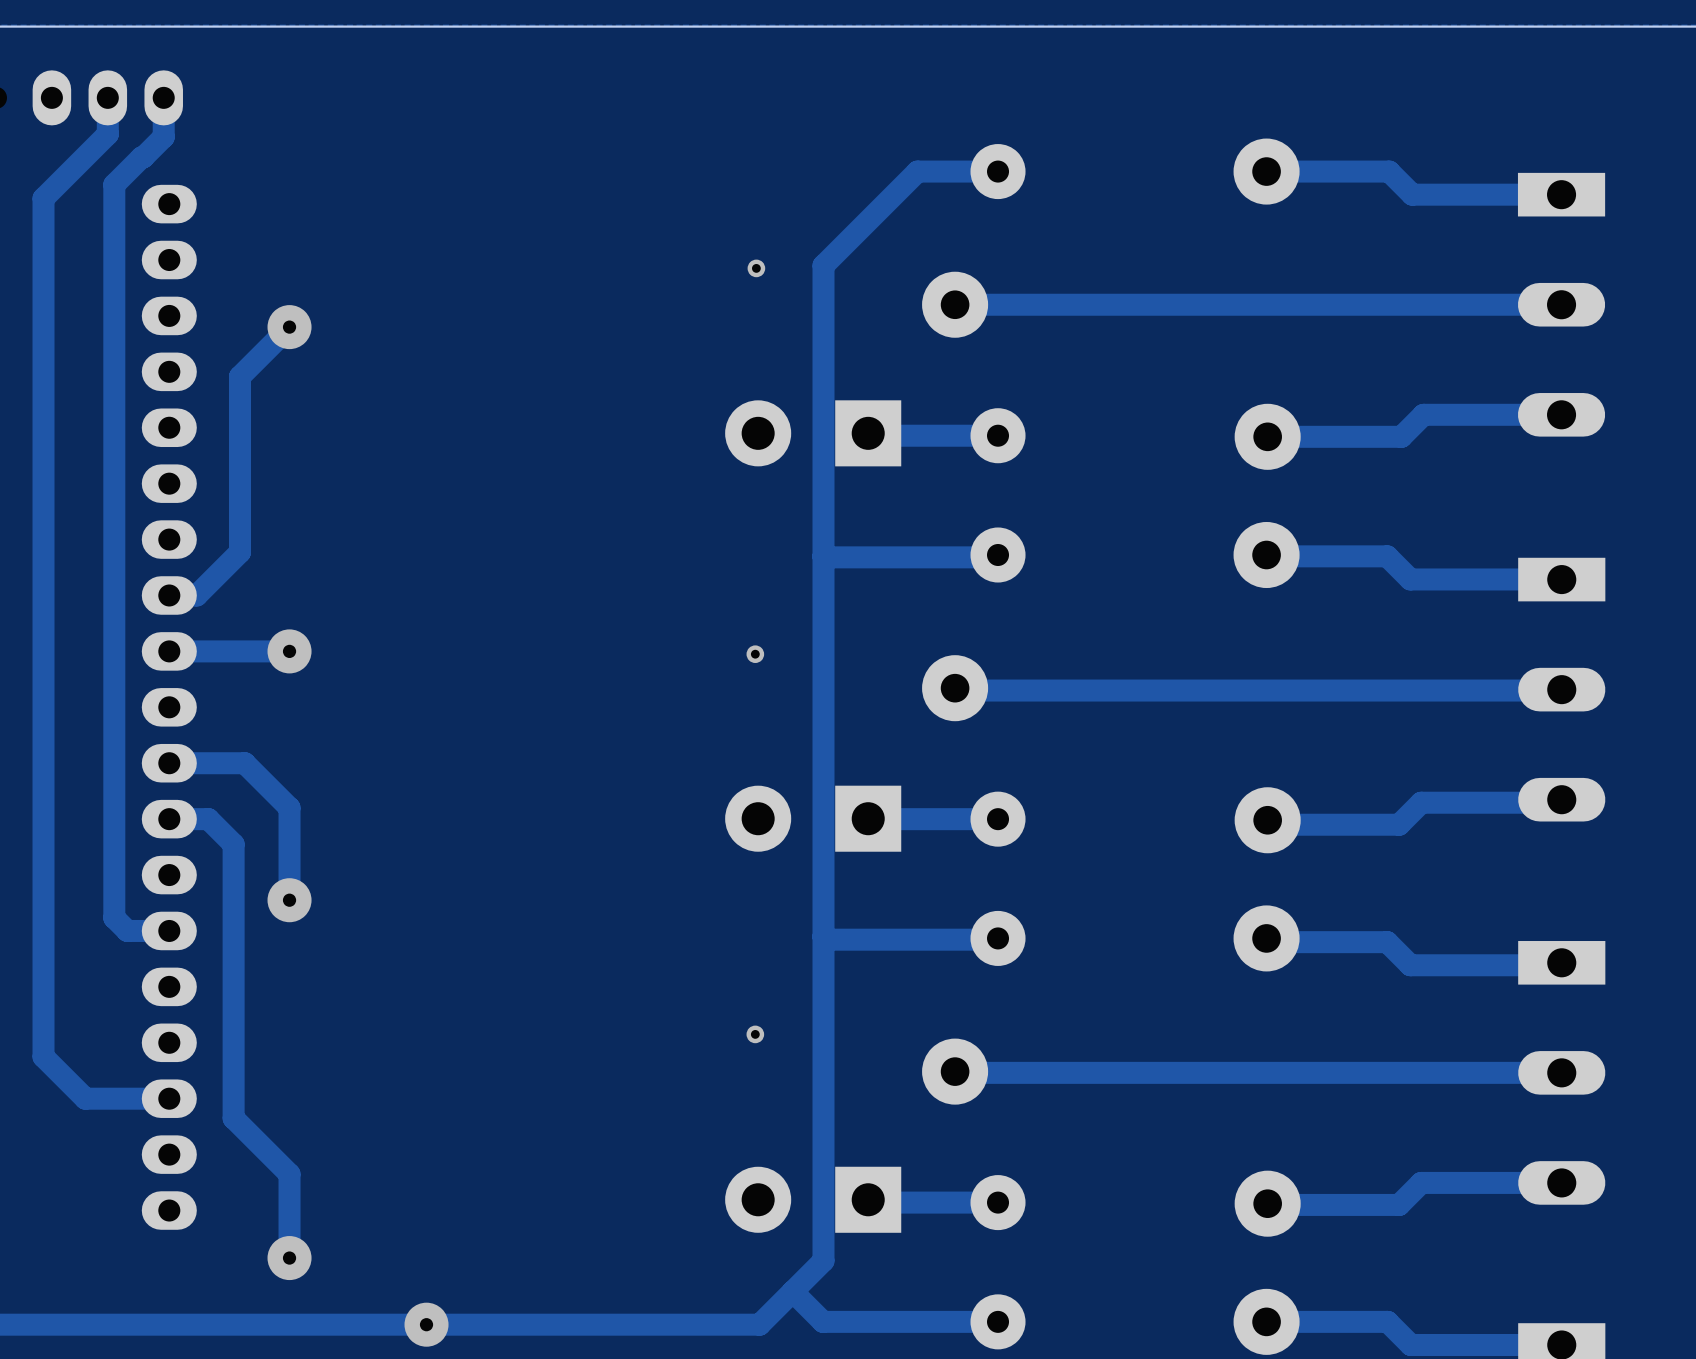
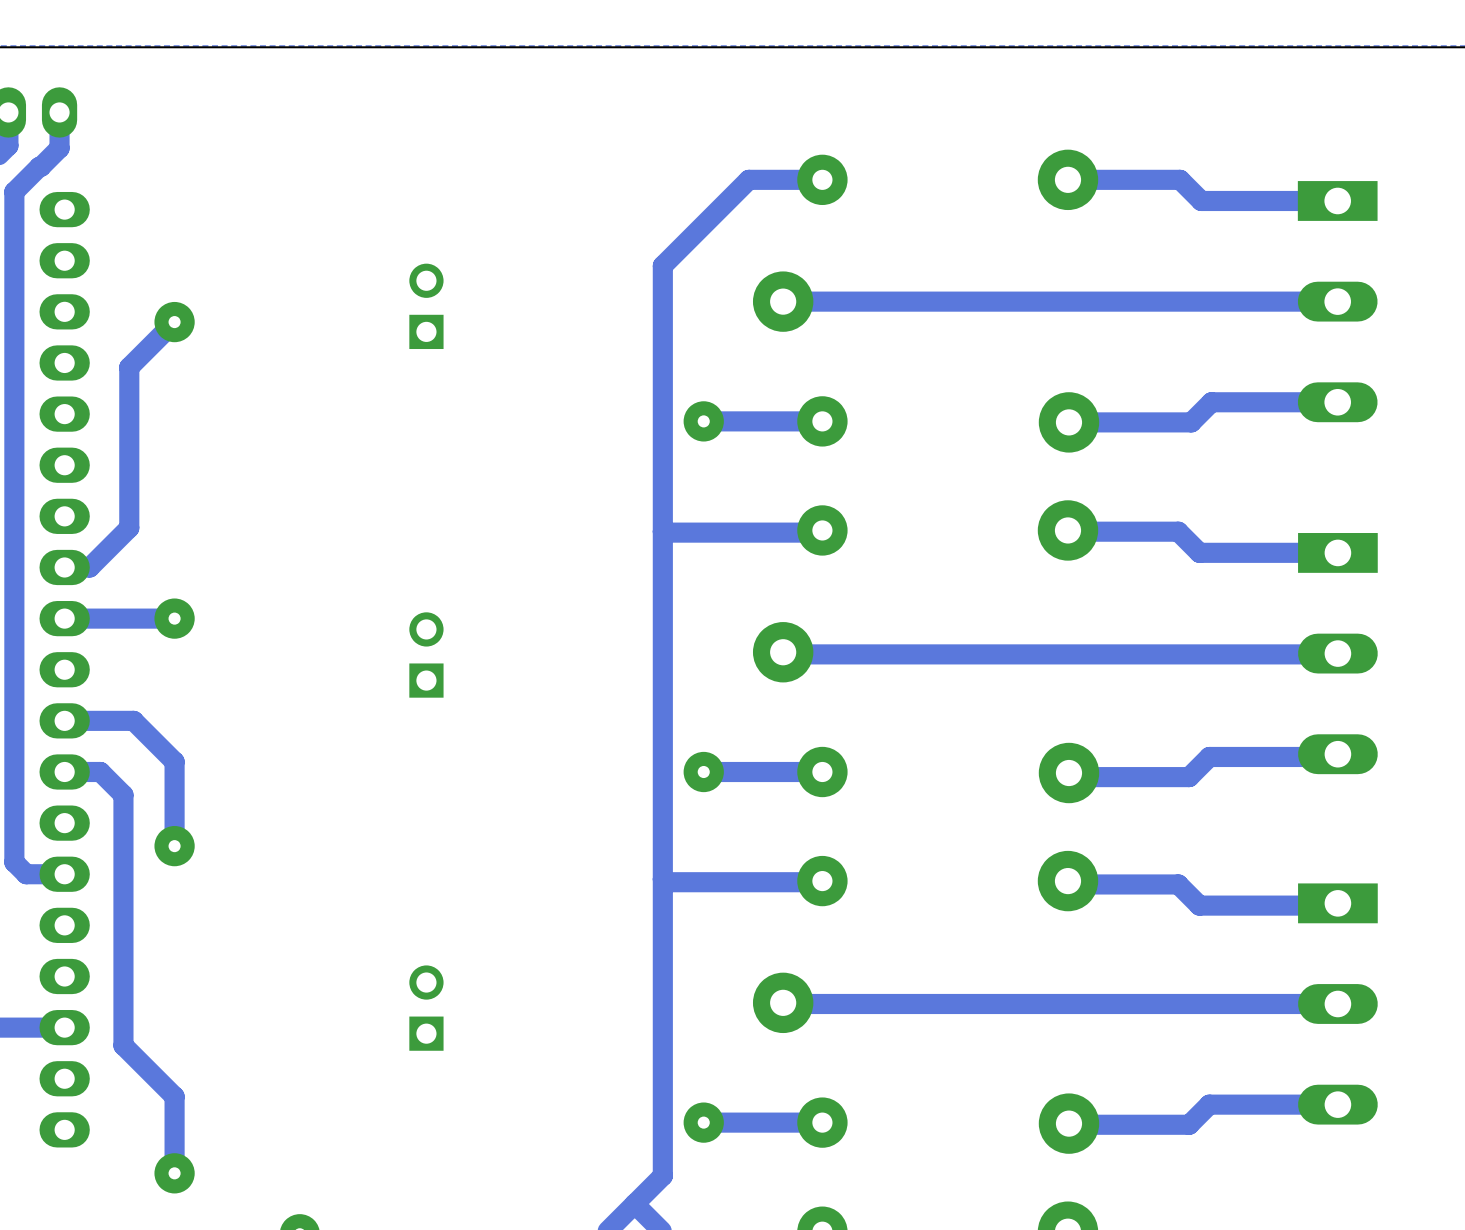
via: (756, 268) -> none
part: none -> (426, 306)
part: (813, 433) -> none
via: none -> (703, 421)
via: (755, 654) -> none
part: none -> (426, 655)
part: (813, 818) -> none
via: none -> (703, 772)
via: (755, 1034) -> none
part: none -> (426, 1008)
part: (813, 1199) -> none
via: none -> (703, 1122)

